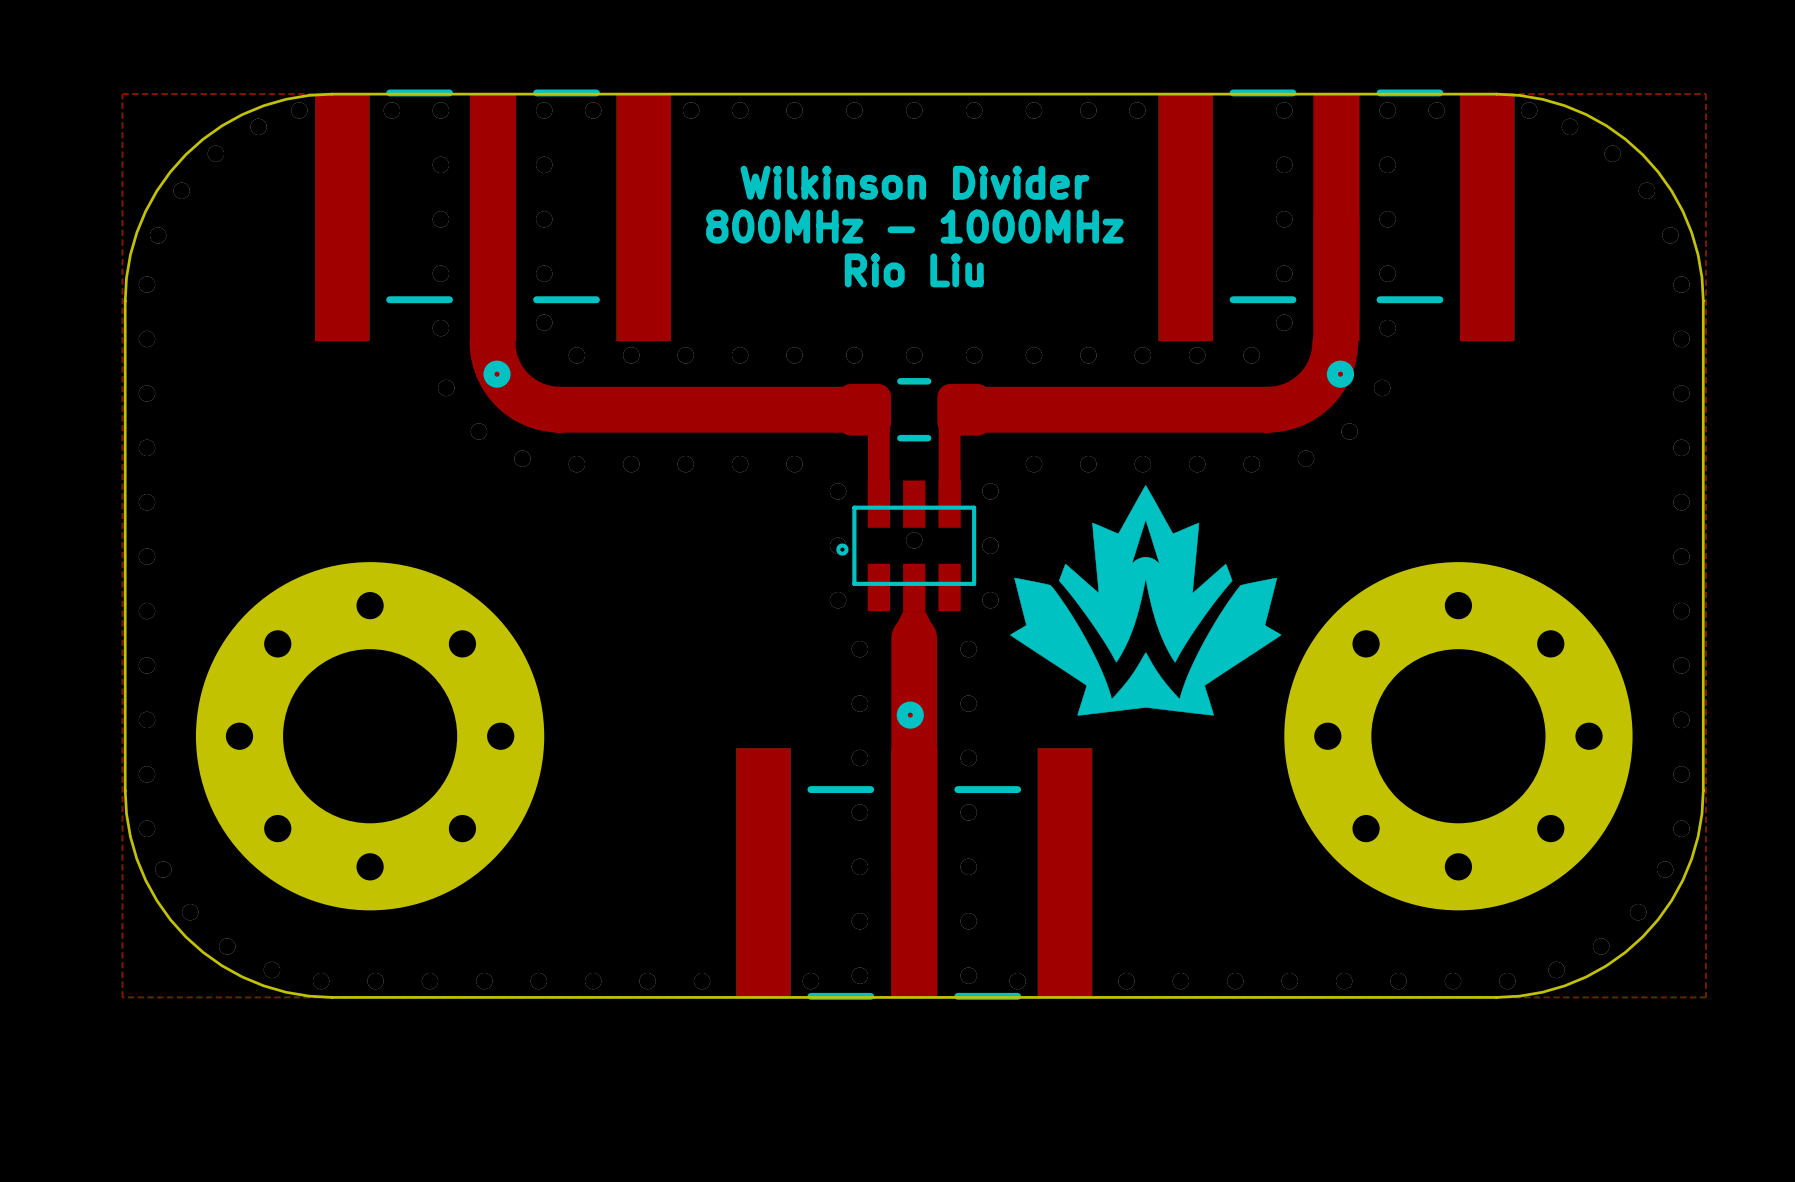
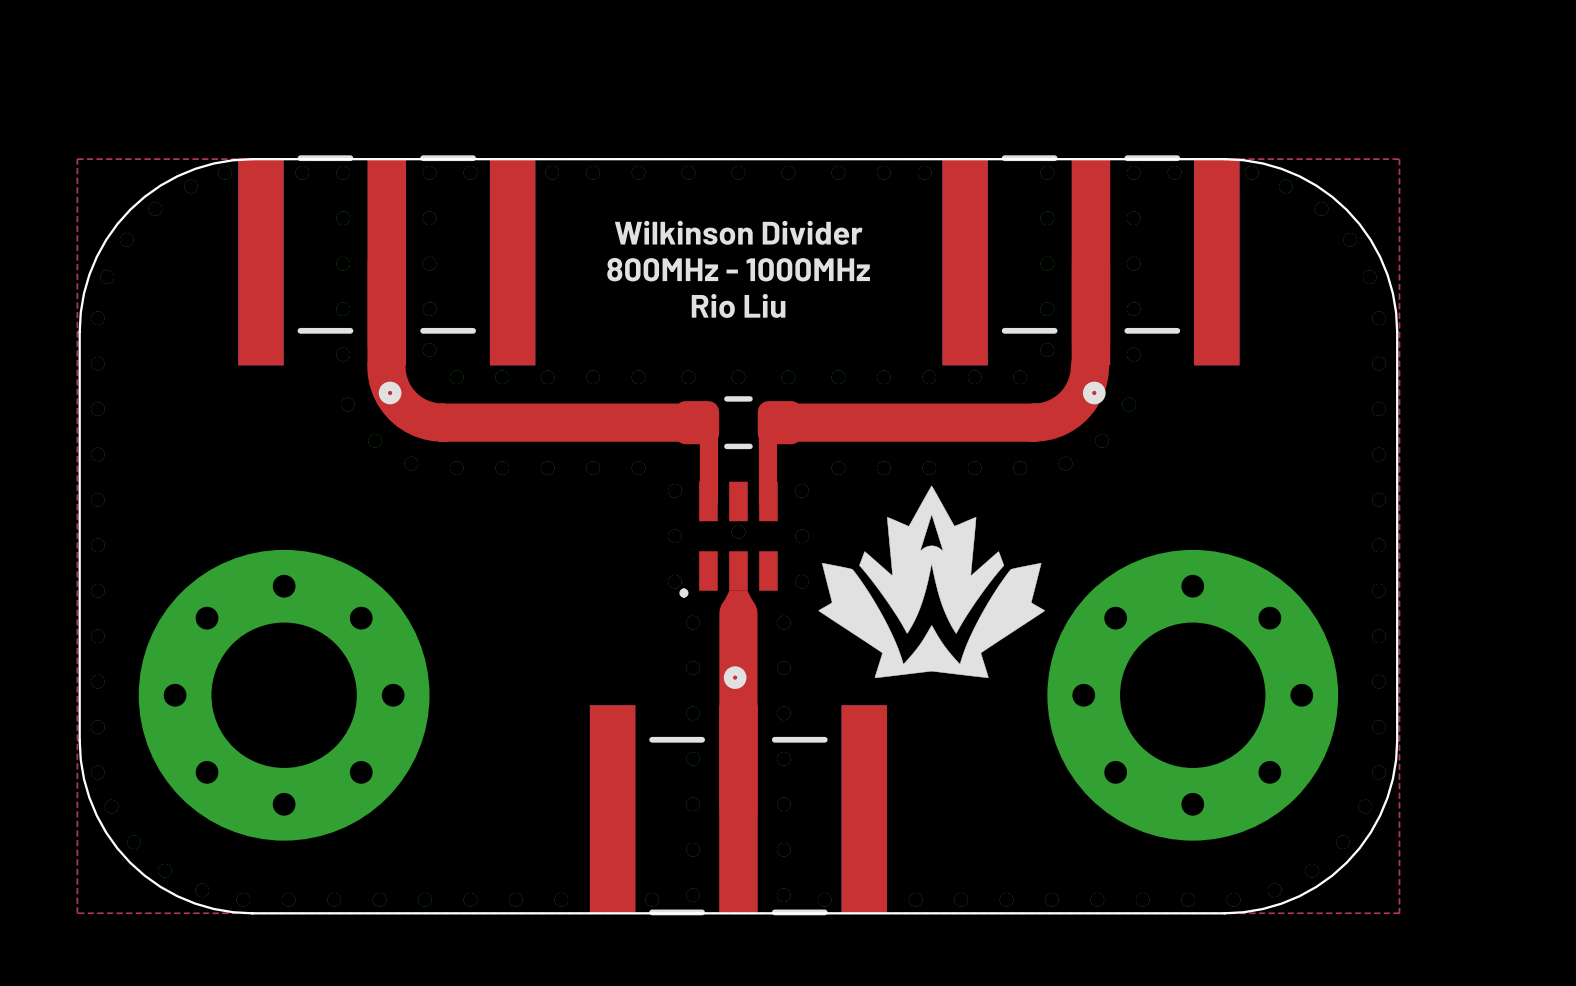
part footprint: [836, 480, 977, 612] -> [679, 481, 778, 598]

